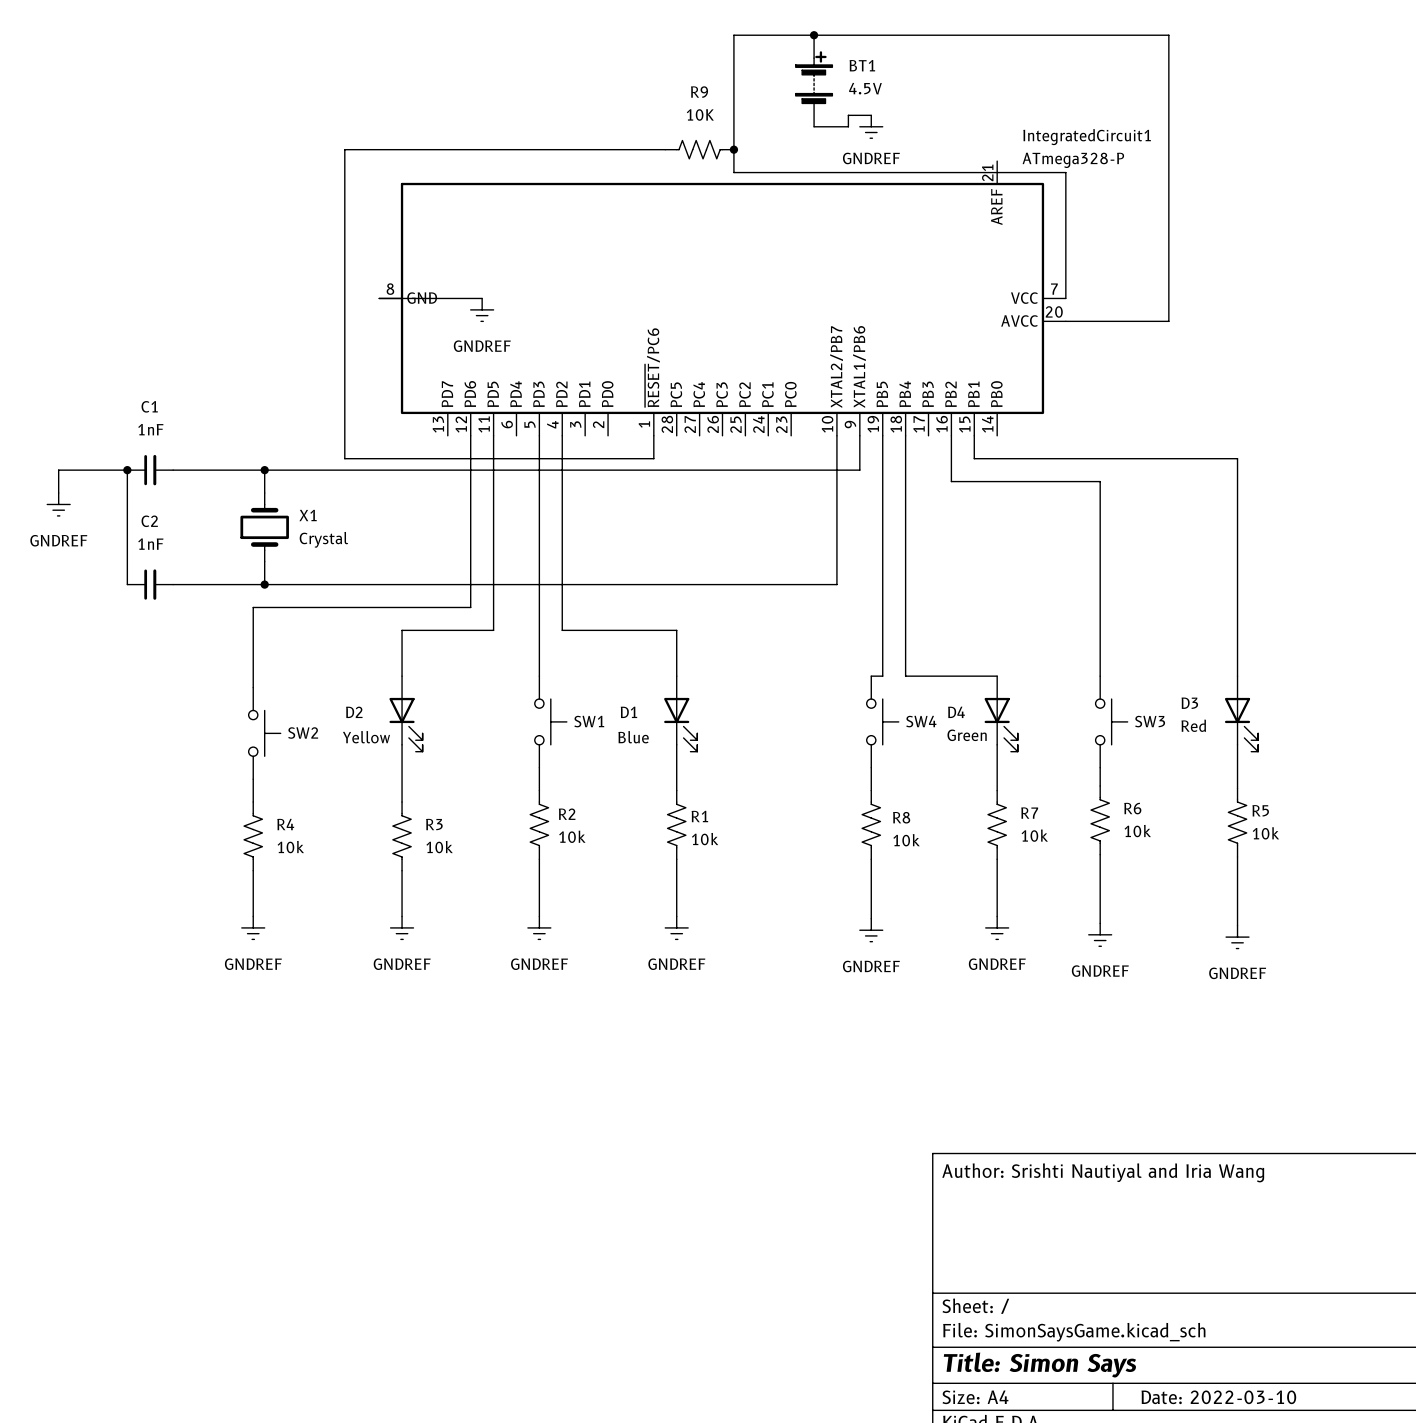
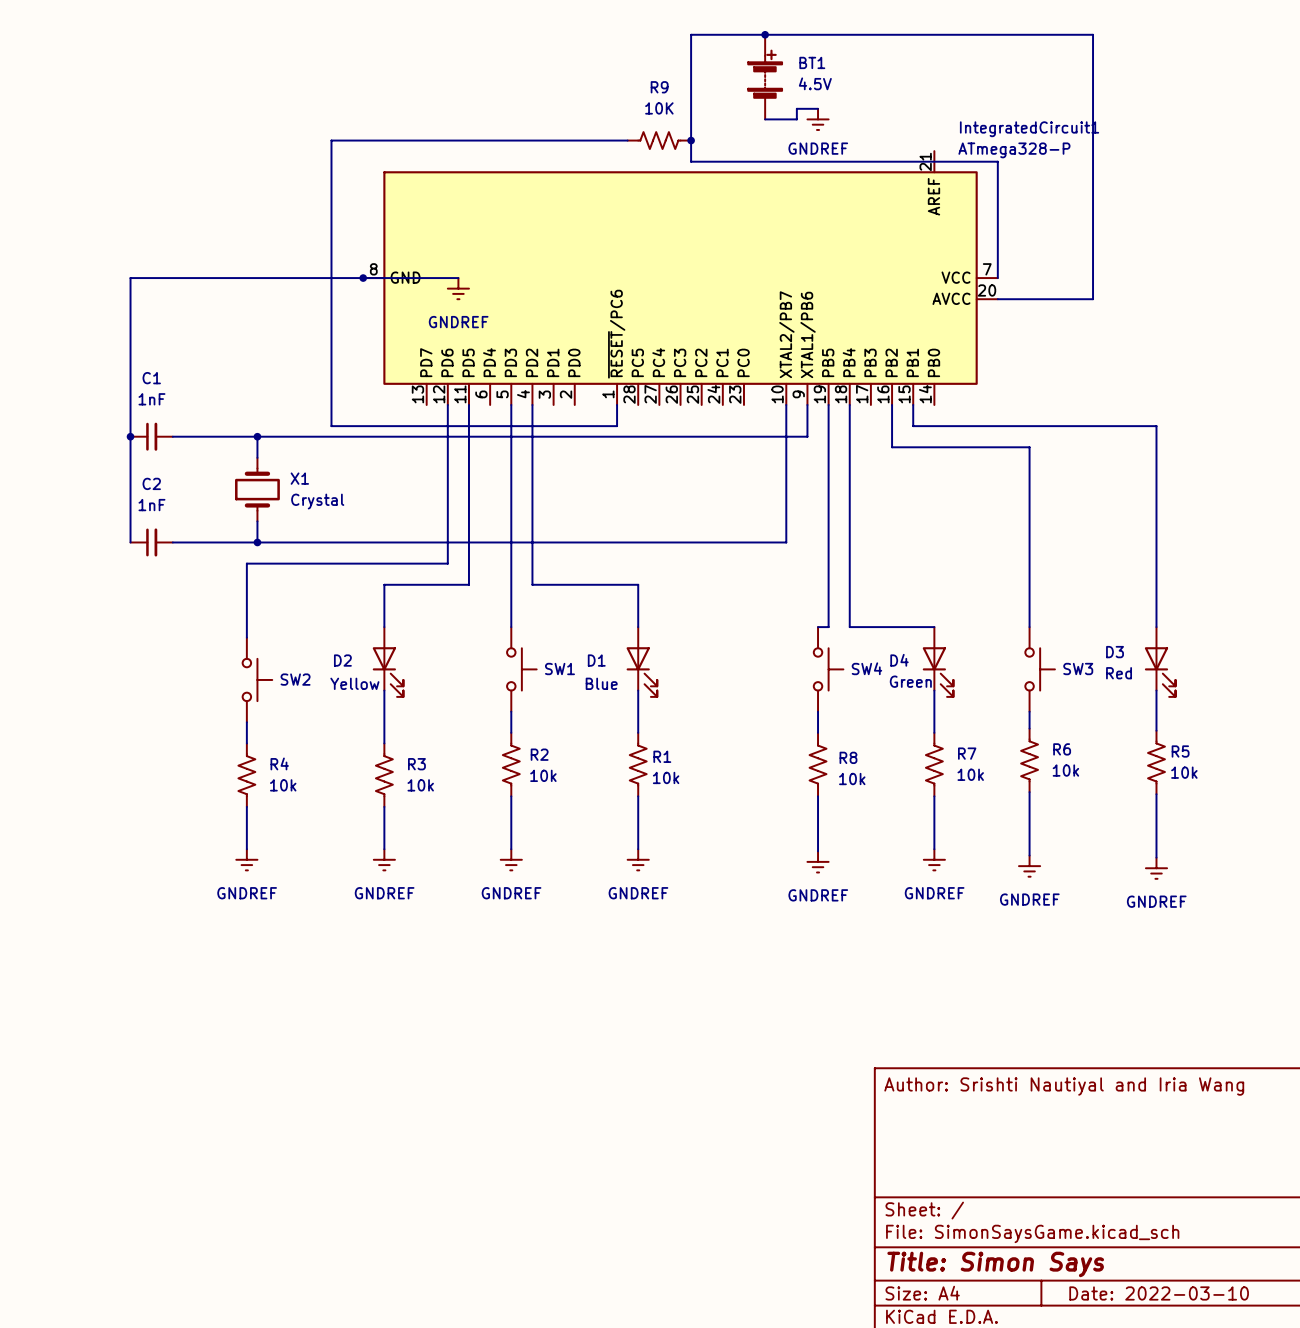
junction: none -> (363, 278)
wire: (127, 470) (58, 470) (58, 493) -> (130, 436) (130, 278) (363, 278)
power symbol: GNDREF (58, 504) -> none

